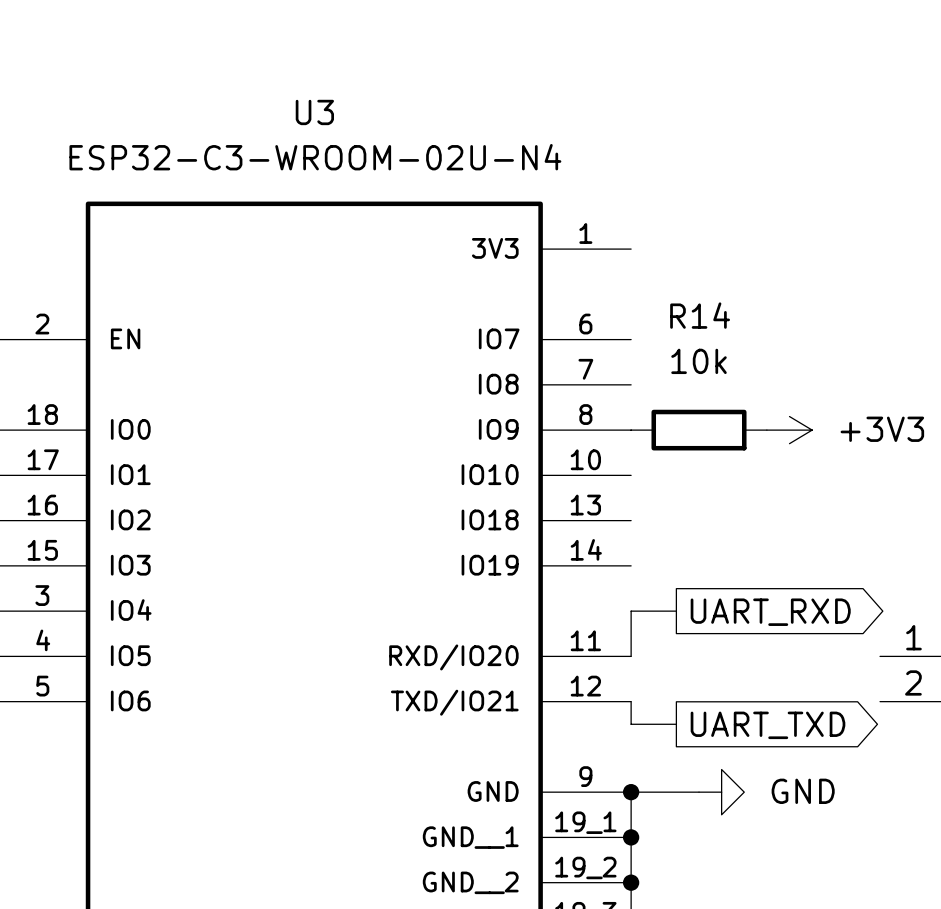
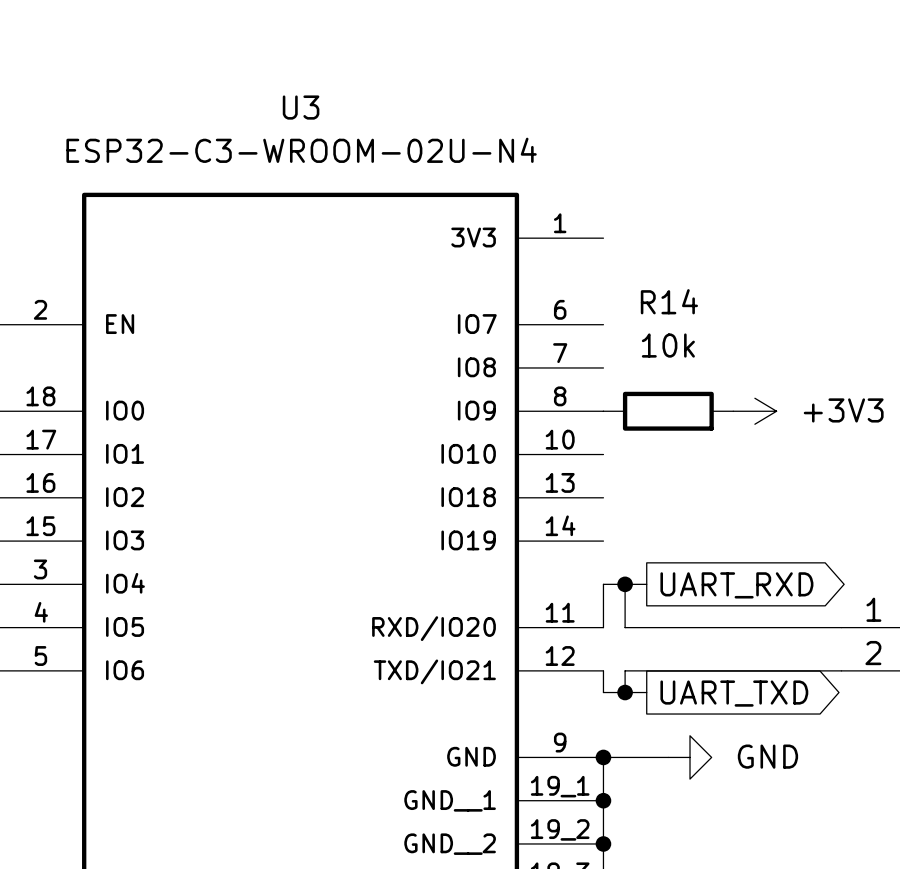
wire: none -> (625, 584) (625, 627) (841, 627)
junction: none -> (625, 584)
wire: none -> (841, 670) (625, 670) (625, 692)
junction: none -> (625, 692)

